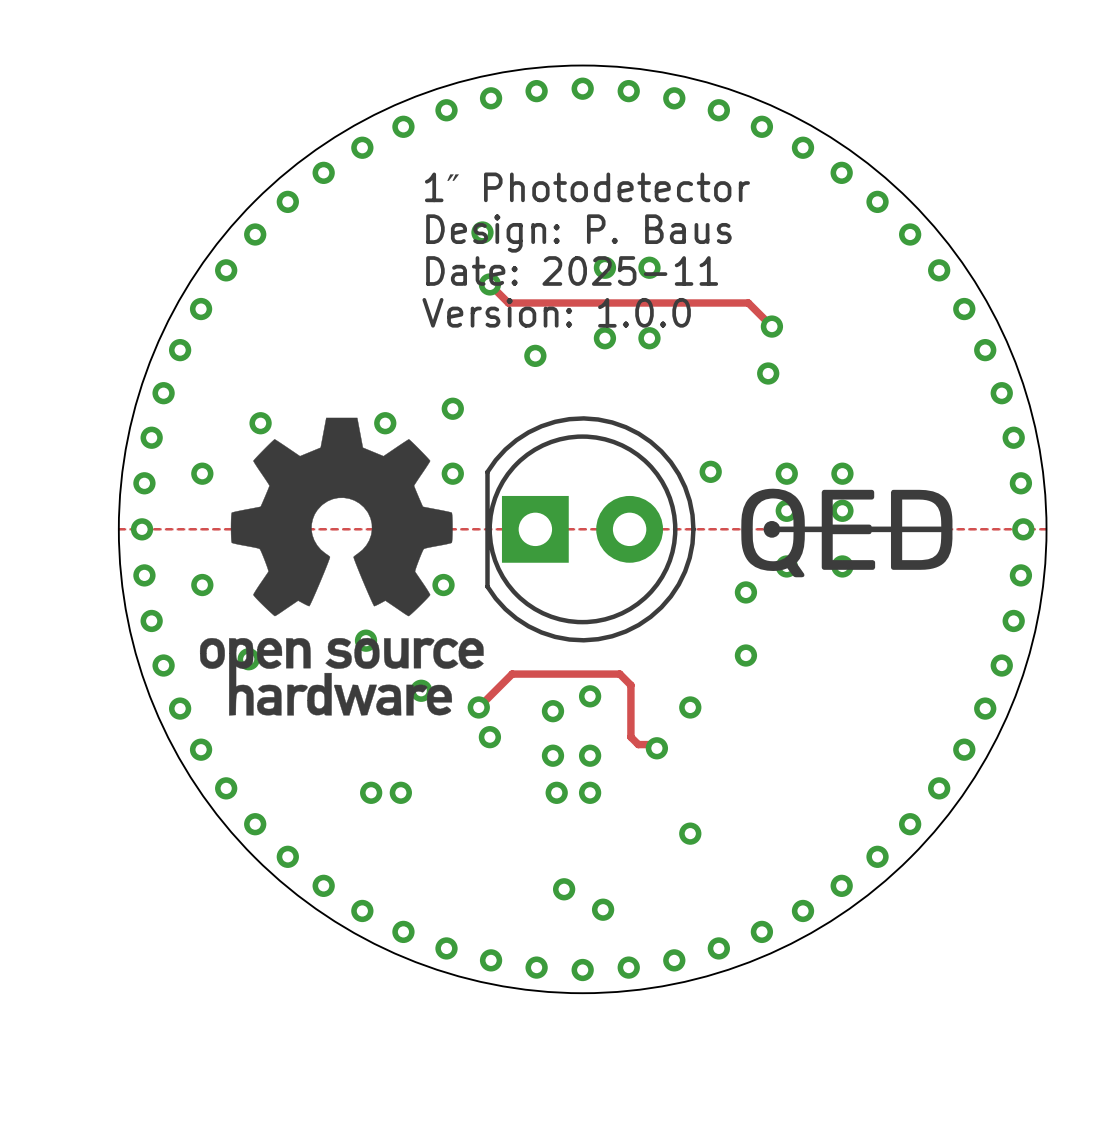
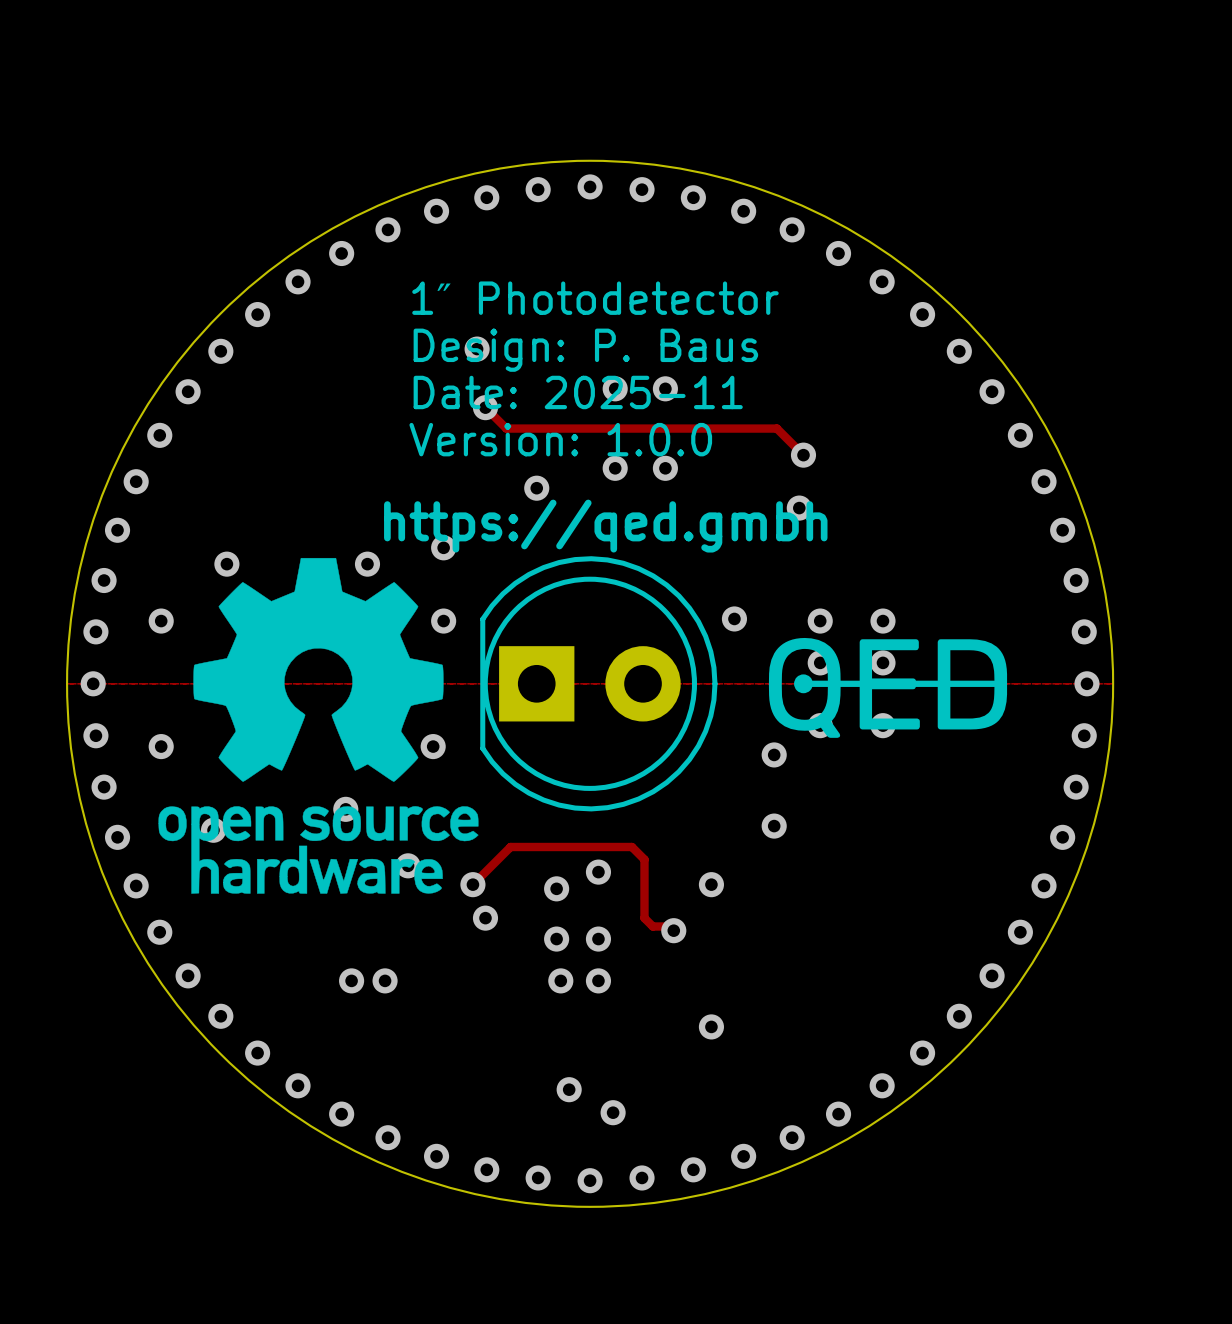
text: none -> https://qed.gmbh (605, 526)

